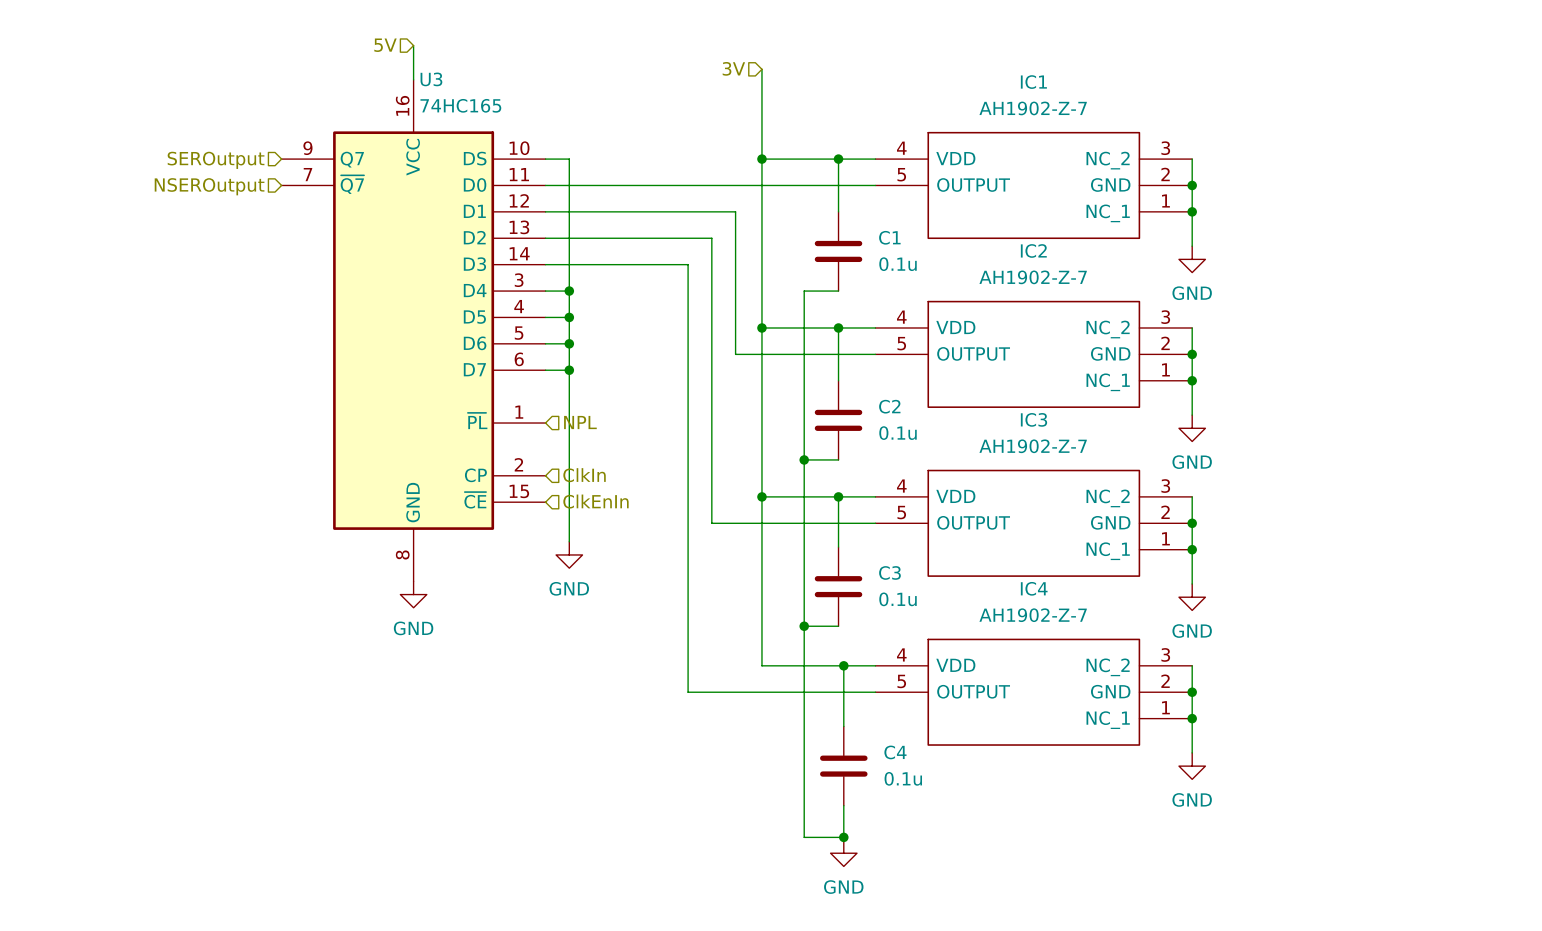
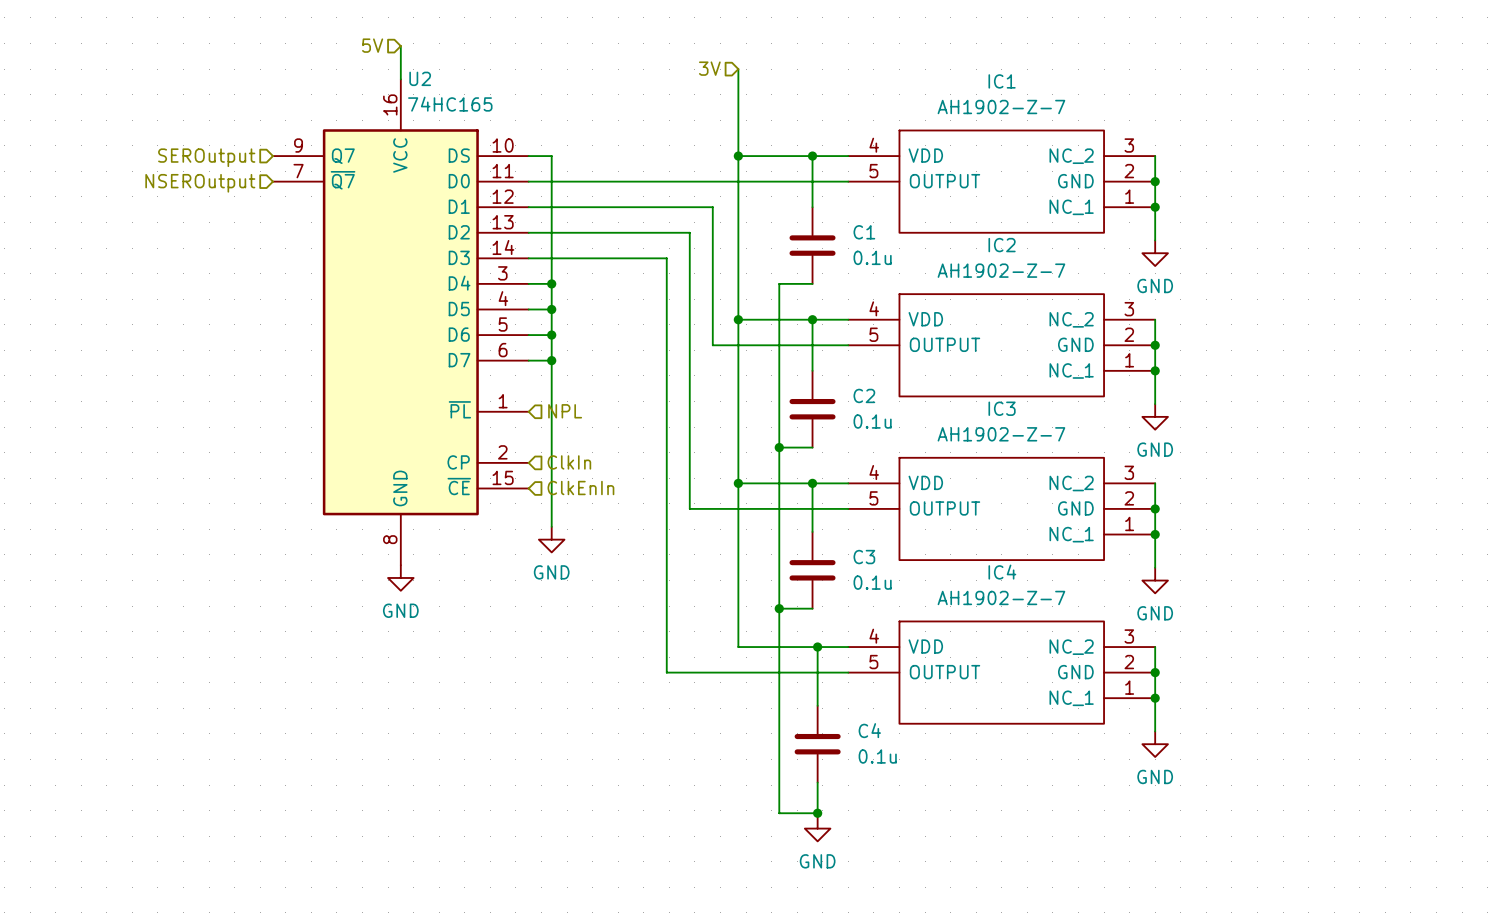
U3 name: U3 (431, 79) -> U2 (420, 78)

